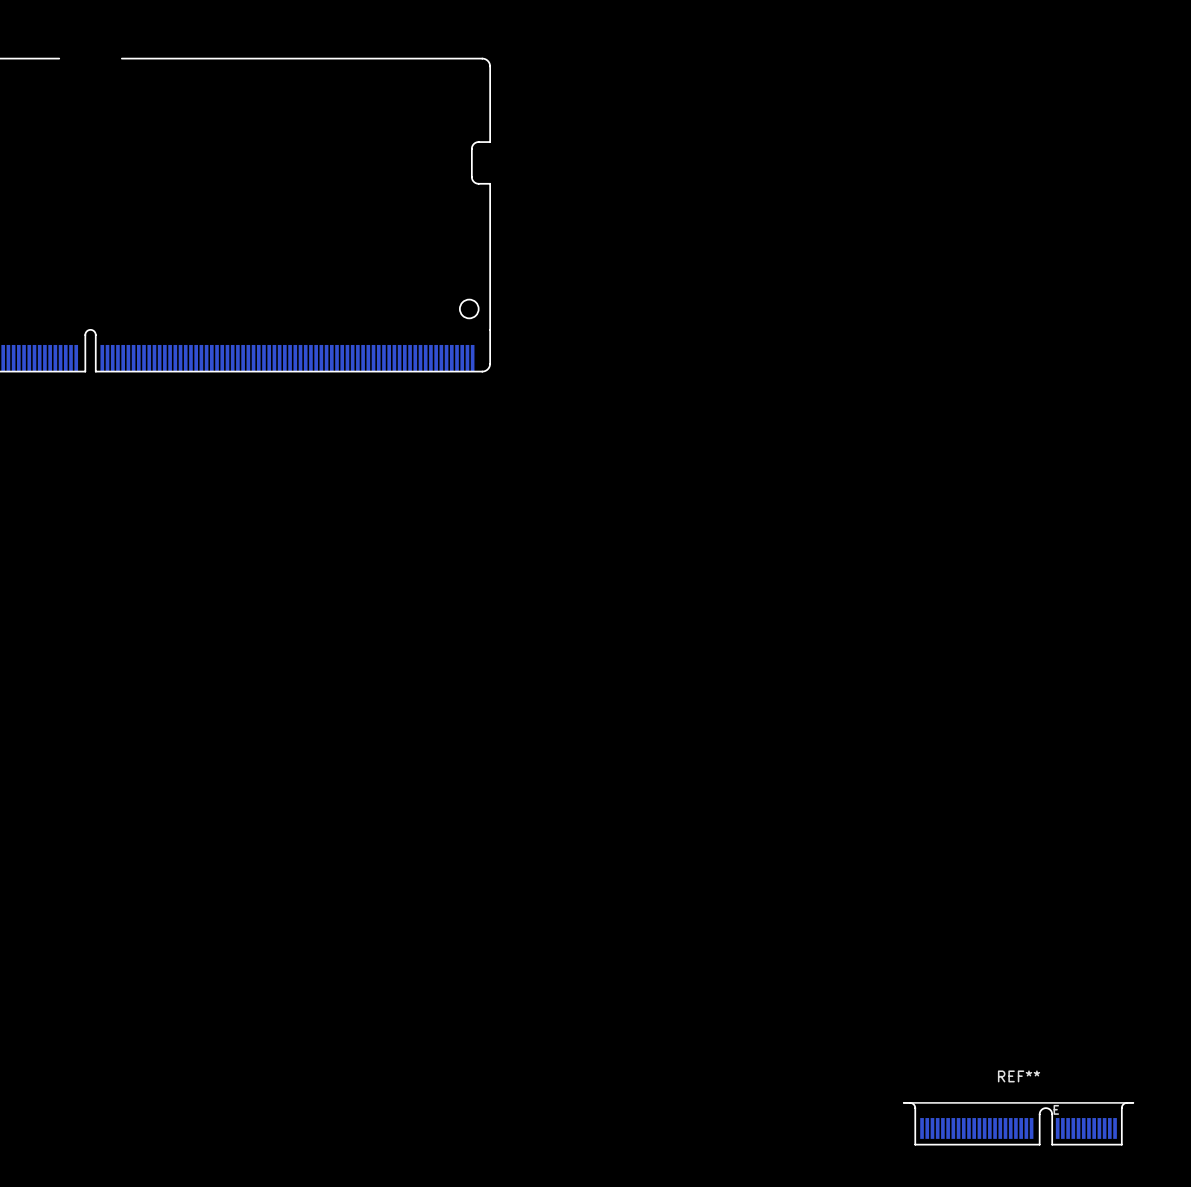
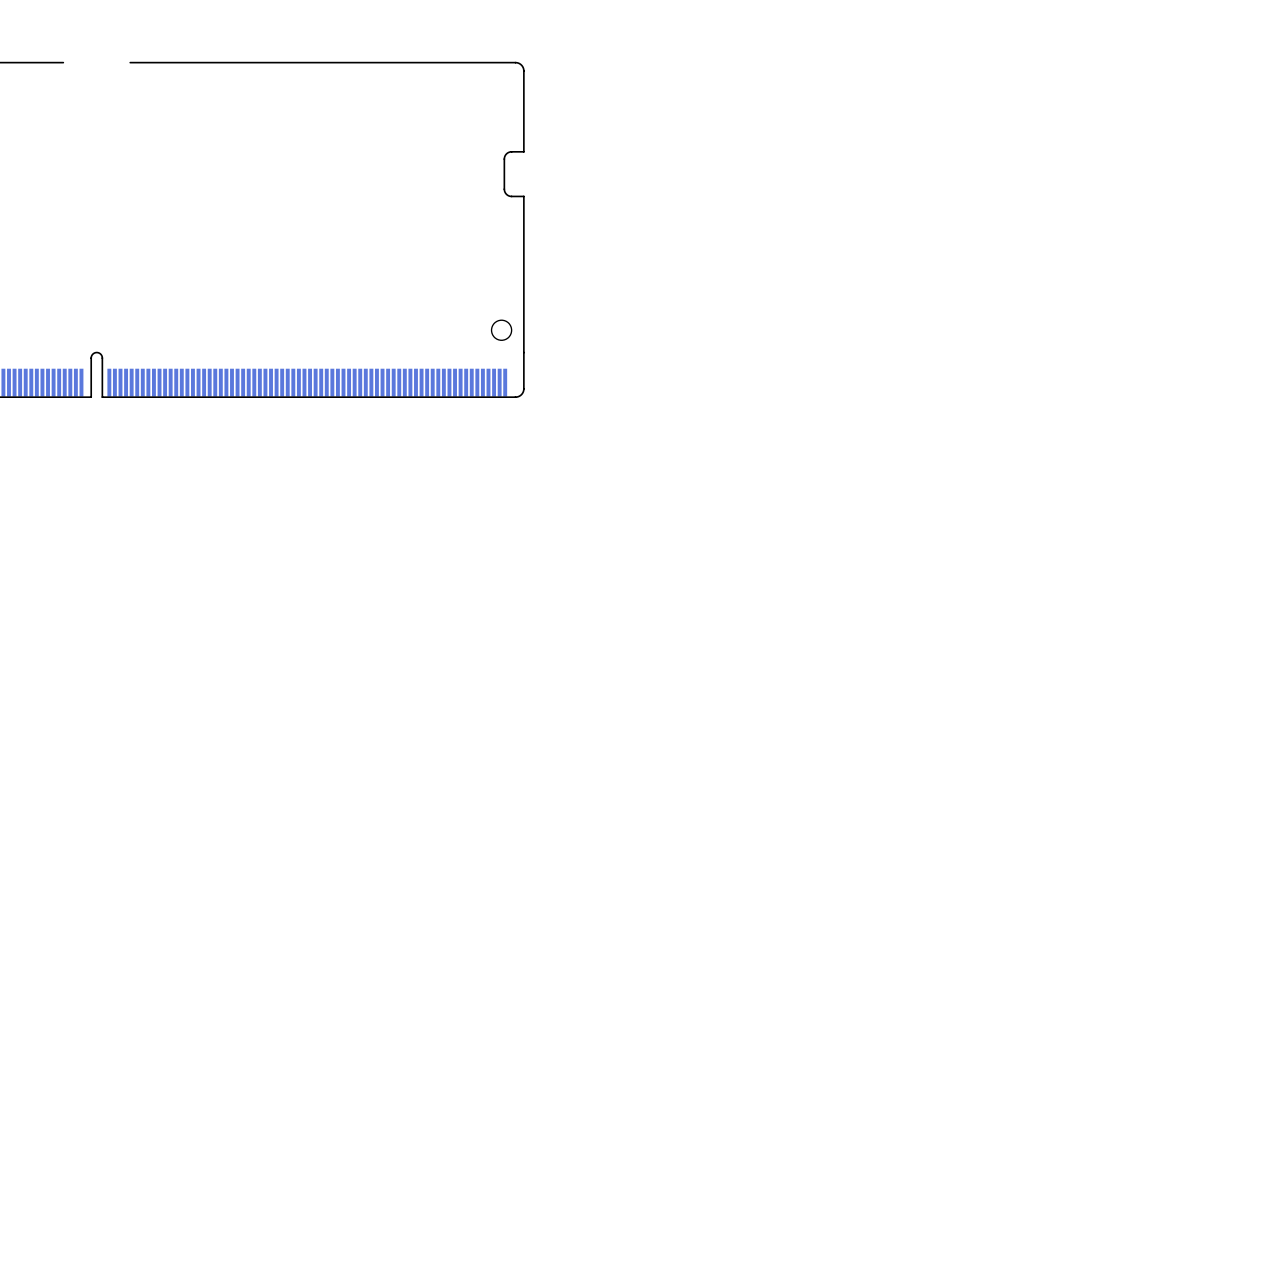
REF**: (1018, 1123) -> none

